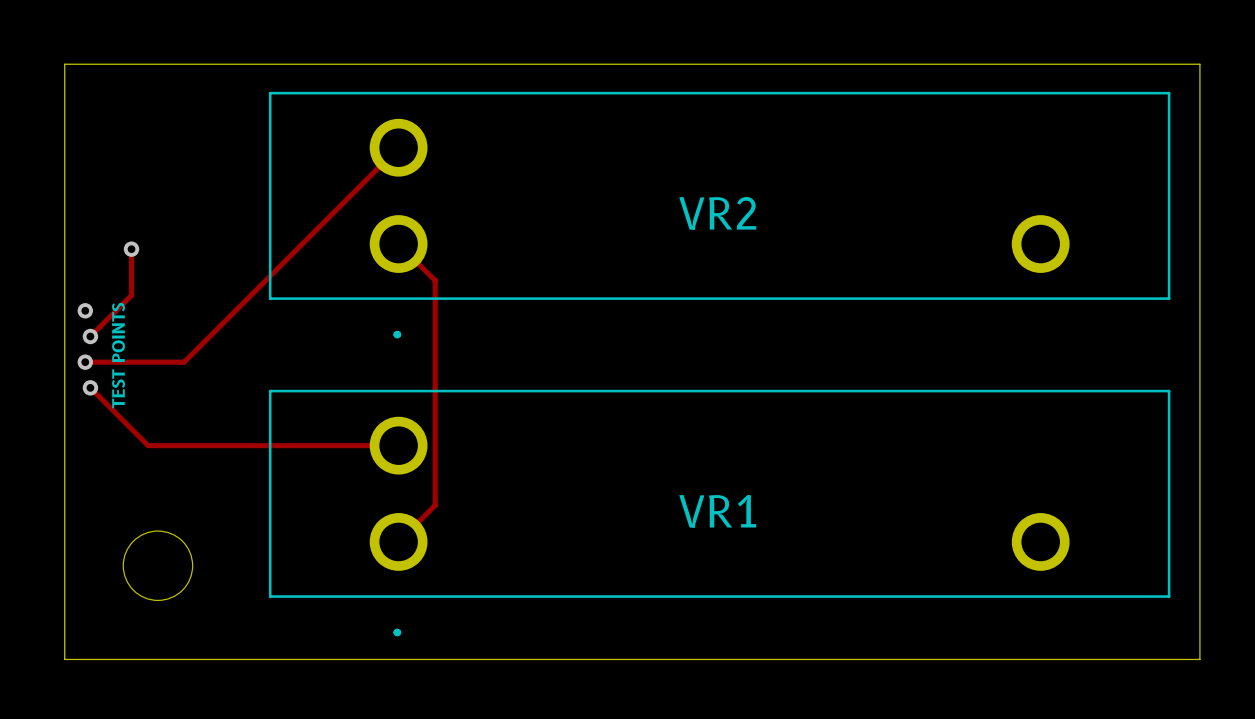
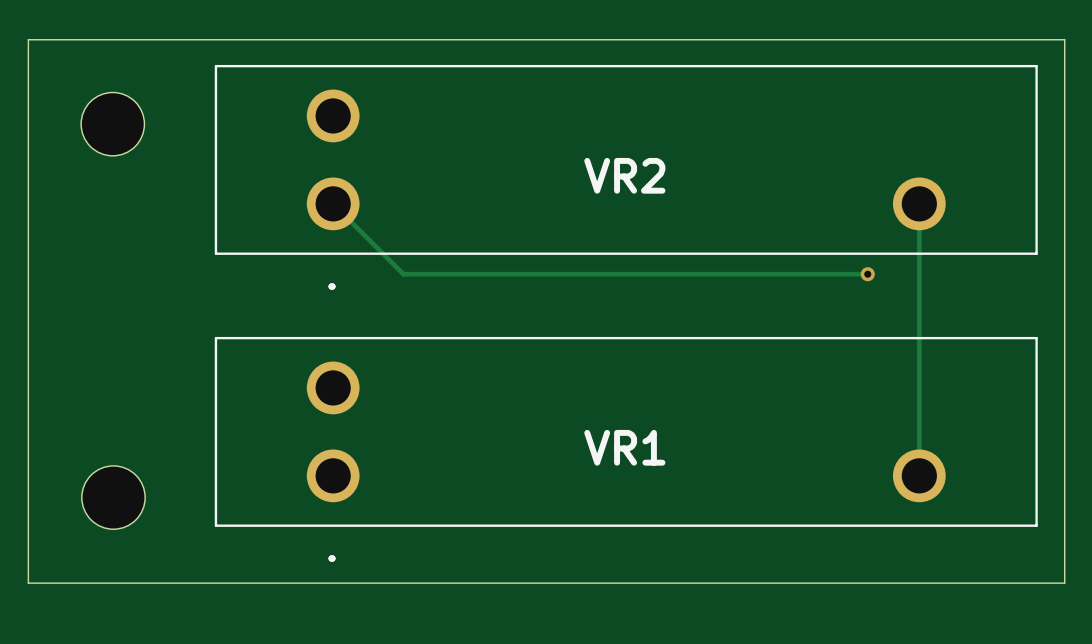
track: (398, 147) (184, 362) (85, 362) -> none
part: none -> (112, 124)
track: none -> (919, 207) (919, 479)
track: (131, 249) (131, 295) (90, 336) -> none
via: (131, 249) -> none
track: (435, 280) (435, 505) (398, 541) -> (366, 237) (403, 274) (867, 274)
via: (85, 310) -> none
via: none -> (867, 274)
via: (90, 336) -> none
text: TEST POINTS (118, 355) -> none
via: (85, 362) -> none
track: (90, 387) (148, 445) (398, 445) -> none
via: (90, 387) -> none

